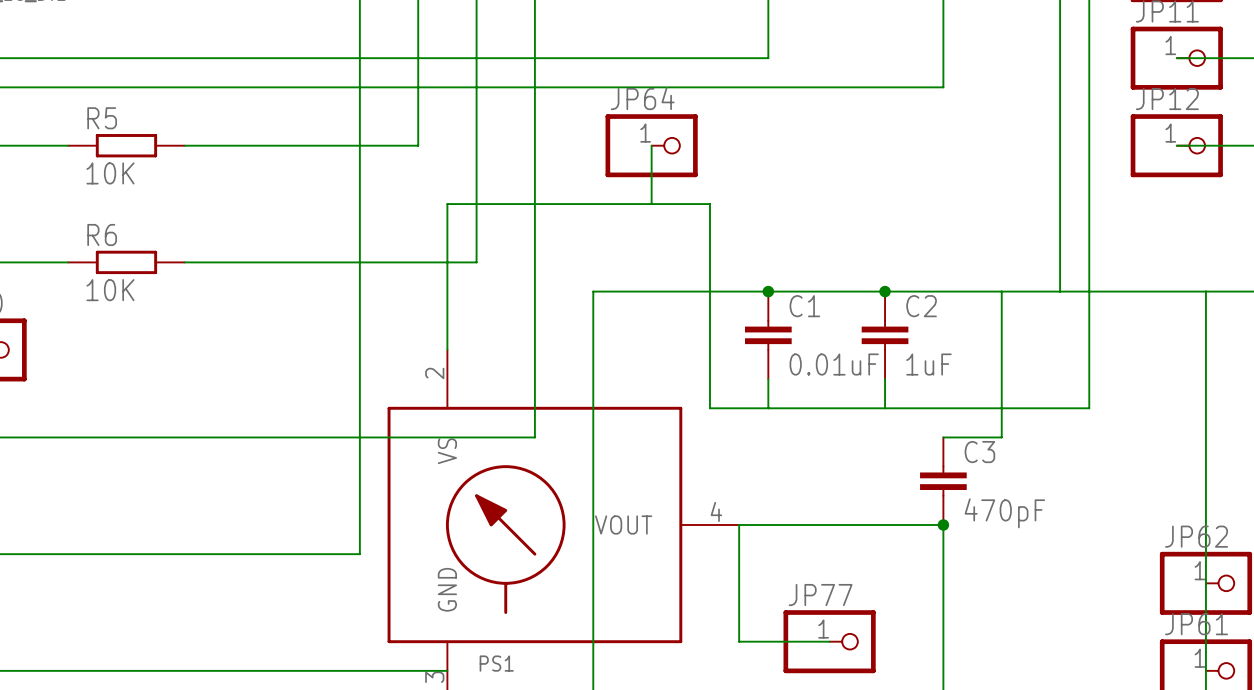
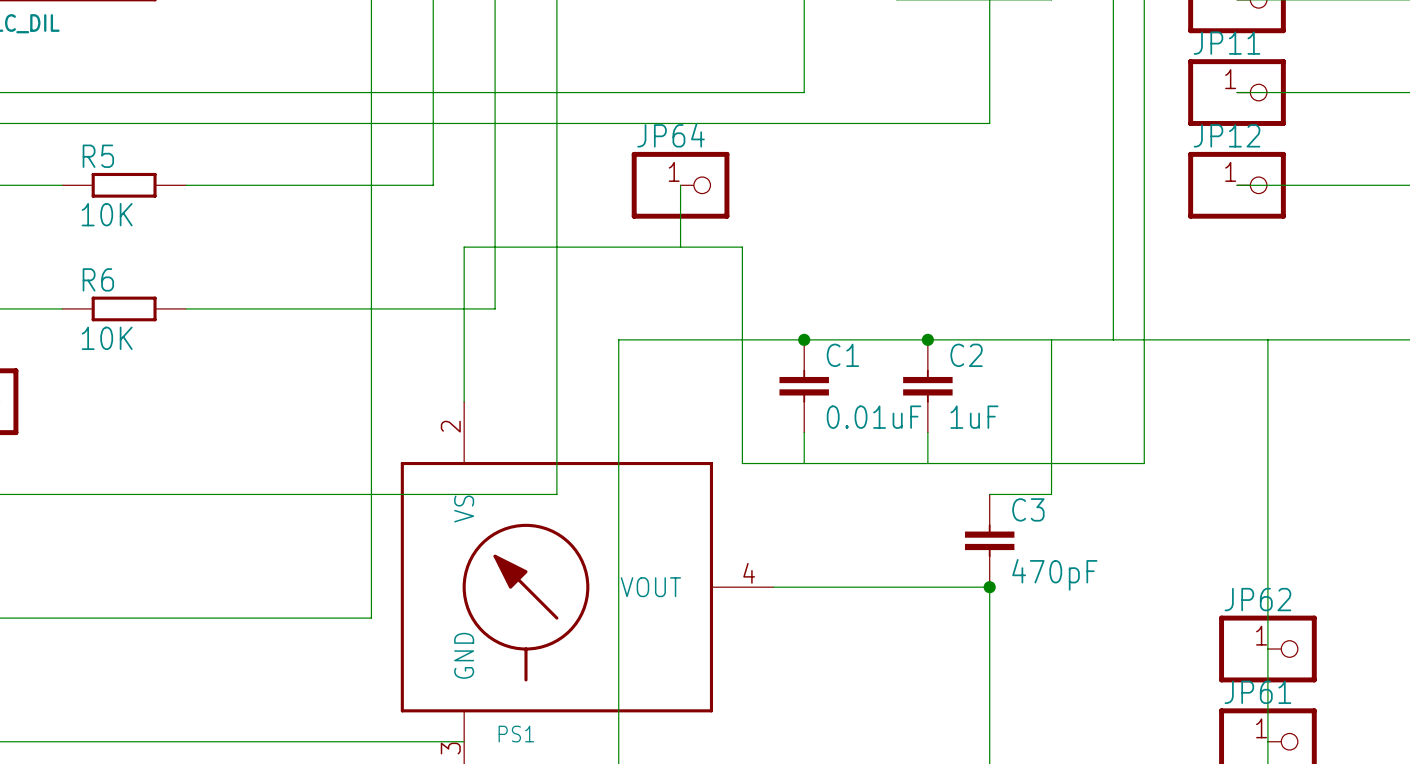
wire: (739, 524) (739, 641) (829, 641) -> none
JP77: (829, 641) -> none

